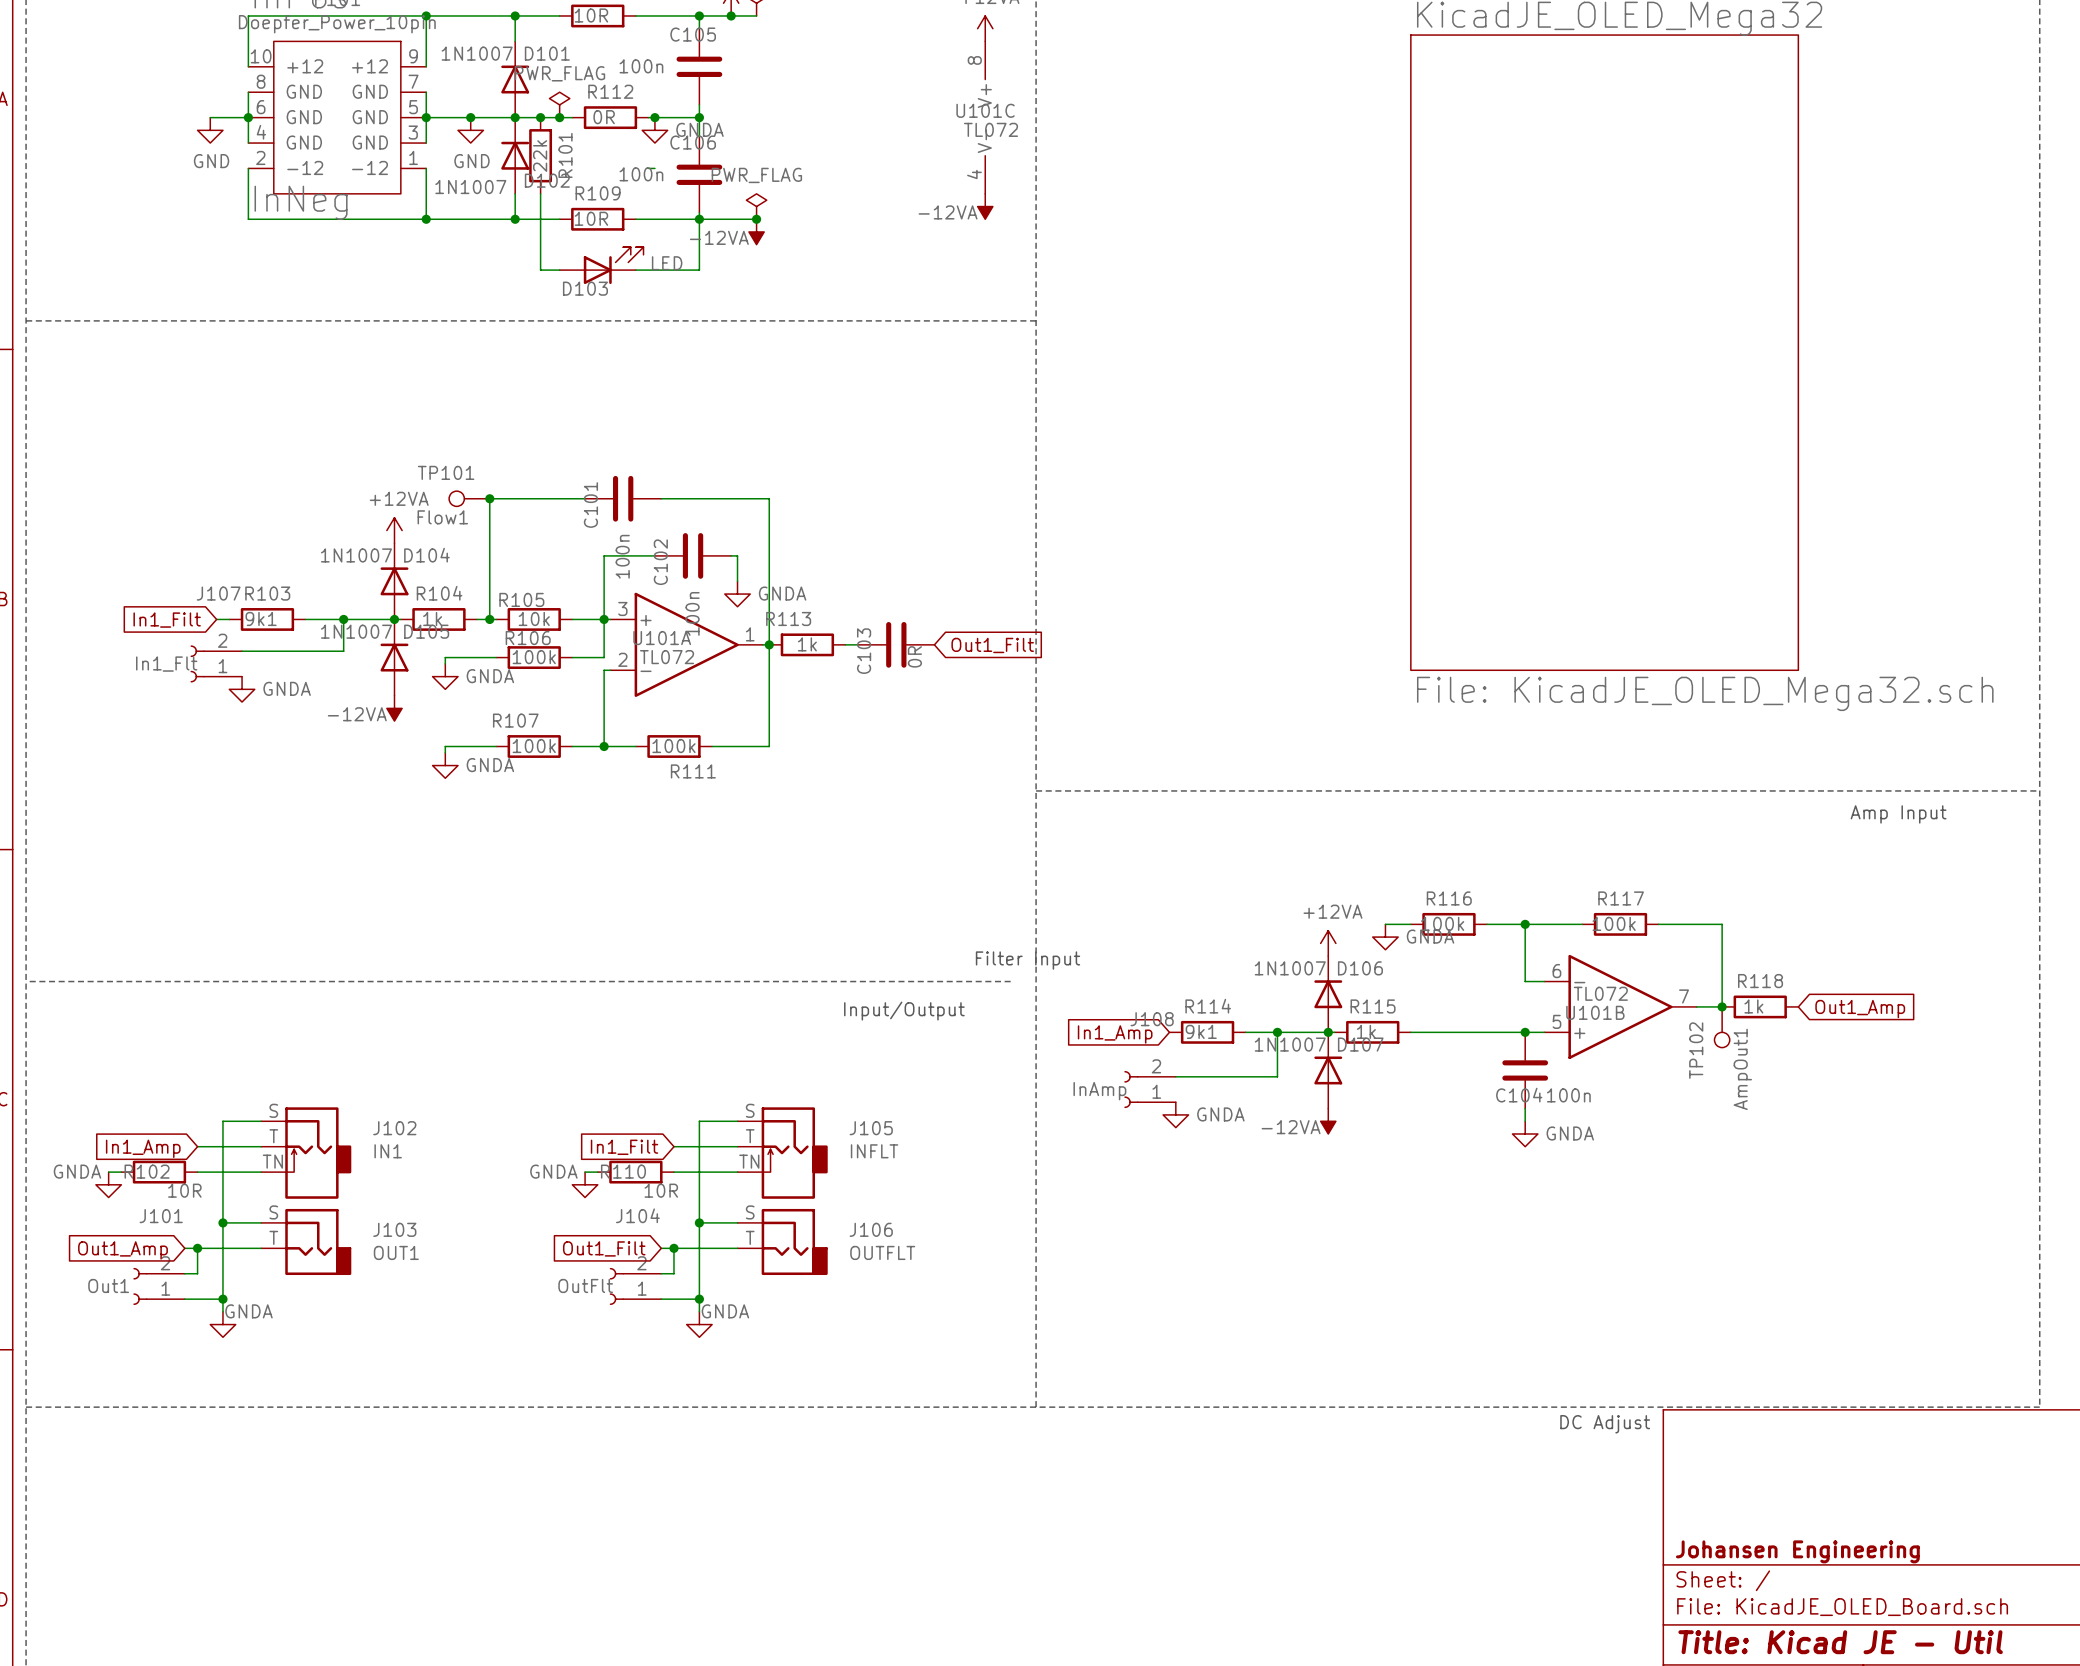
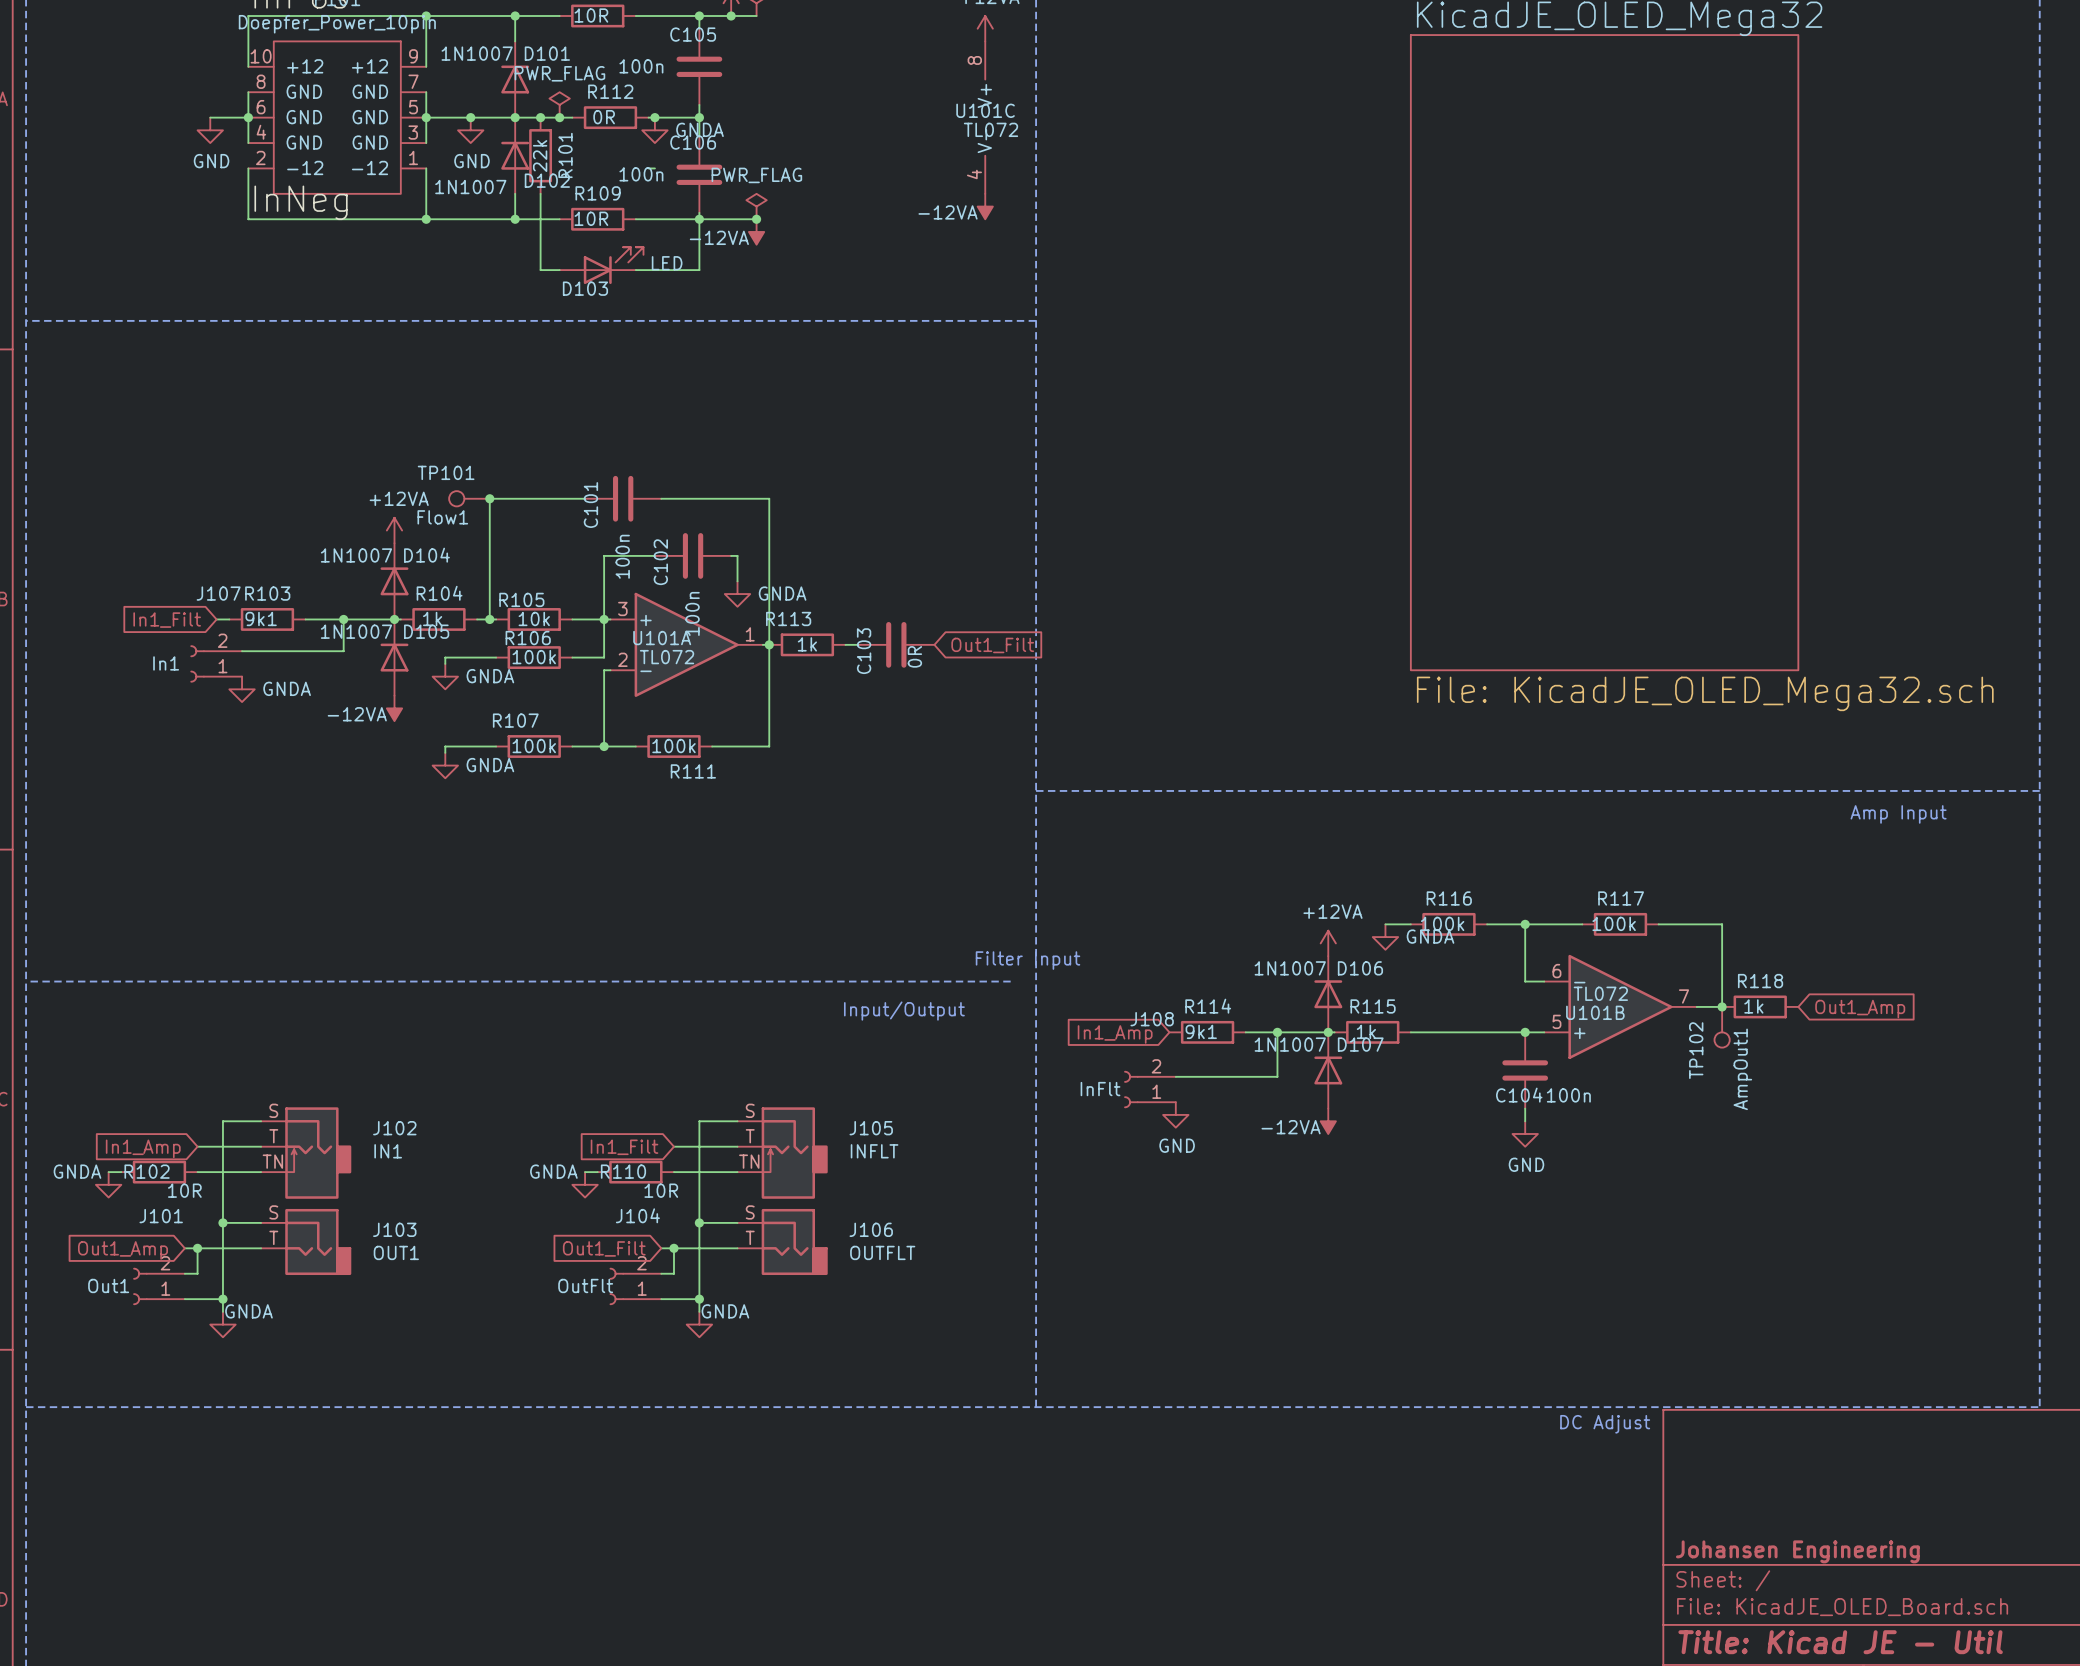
J107 value: In1_Flt (166, 664) -> In1 (166, 663)
J108 value: InAmp (1099, 1091) -> InFlt (1100, 1089)
power symbol: GNDA (1175, 1114) -> GND (1175, 1114)
power symbol: GNDA (1525, 1133) -> GND (1525, 1133)

